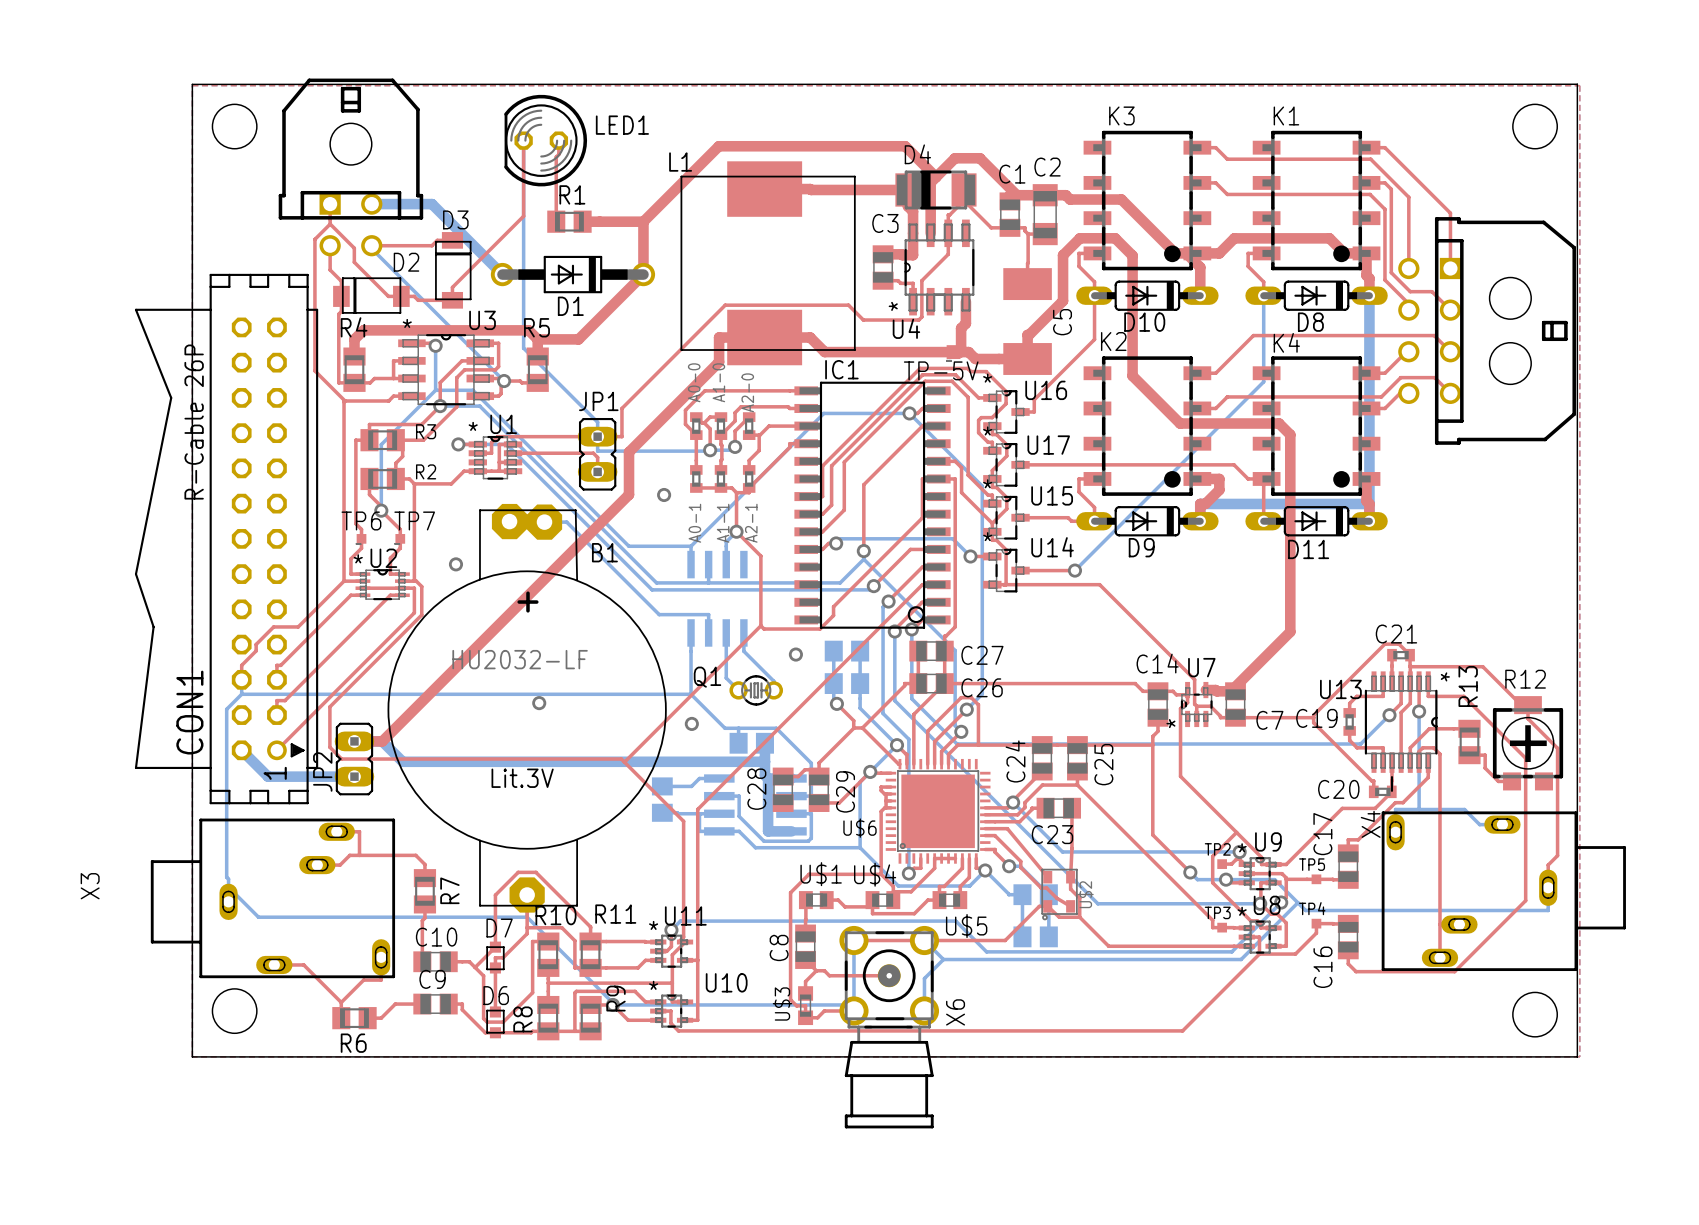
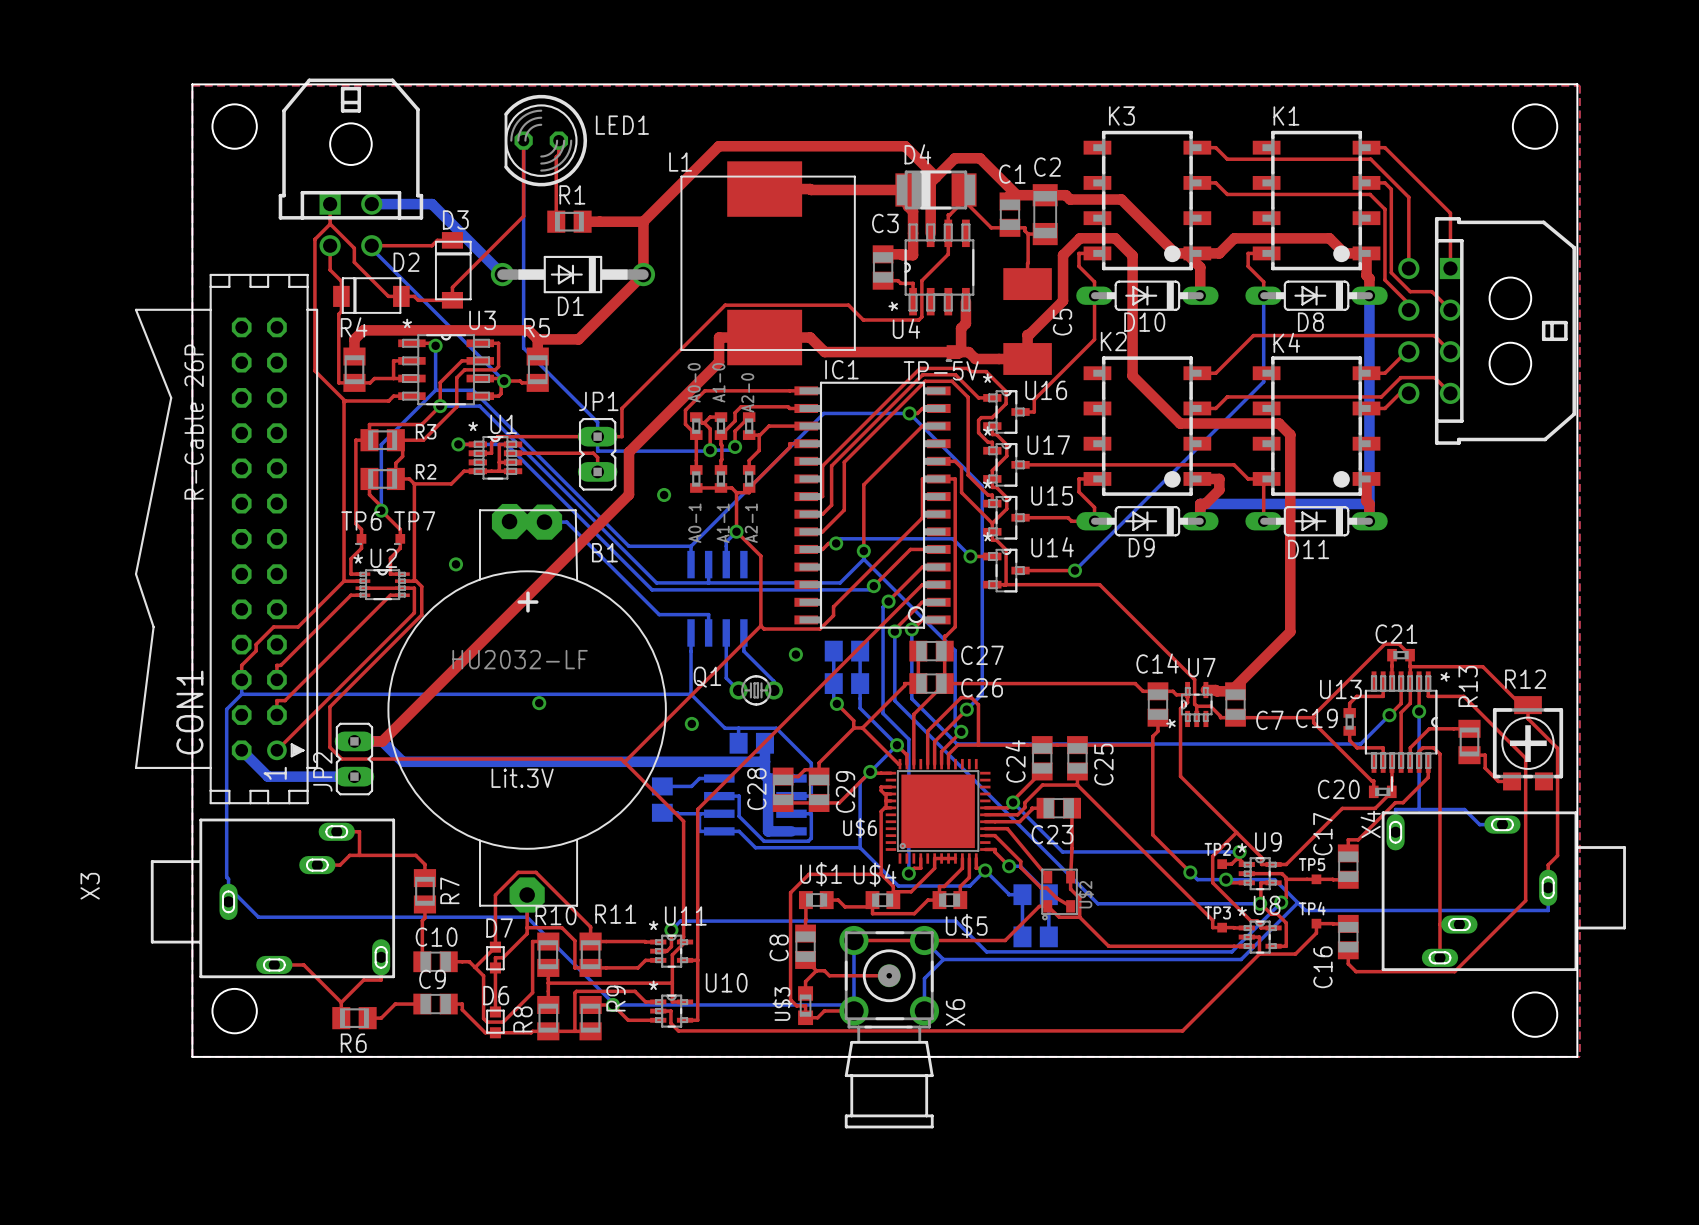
top track: none -> (783, 802) (819, 802)

